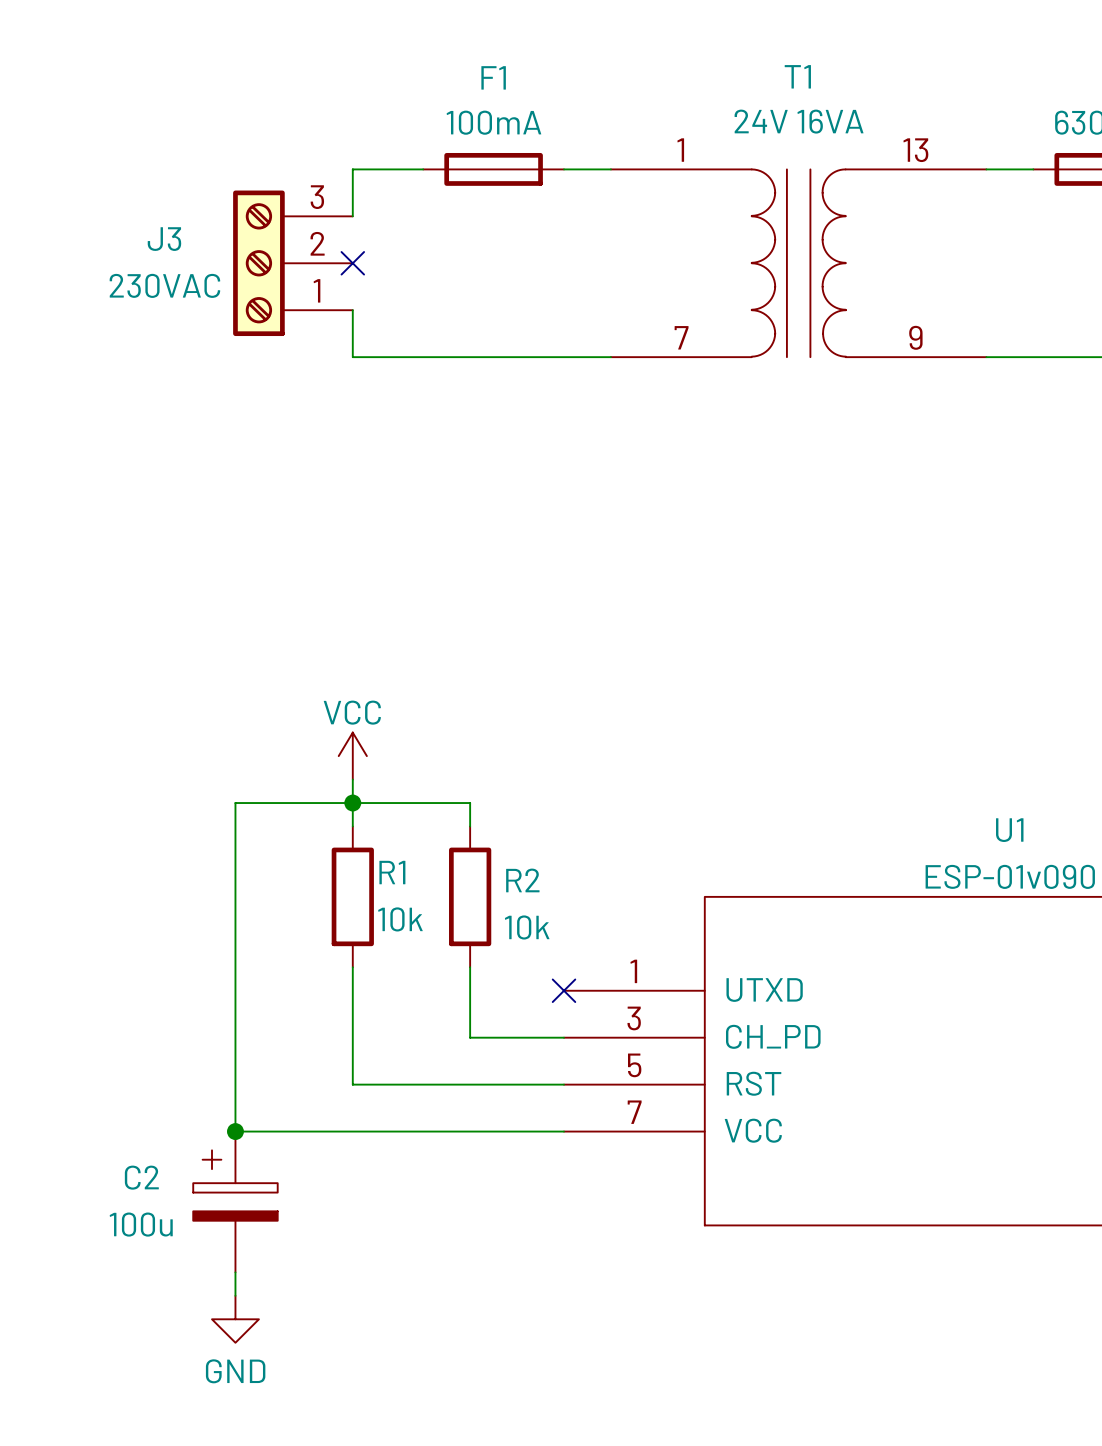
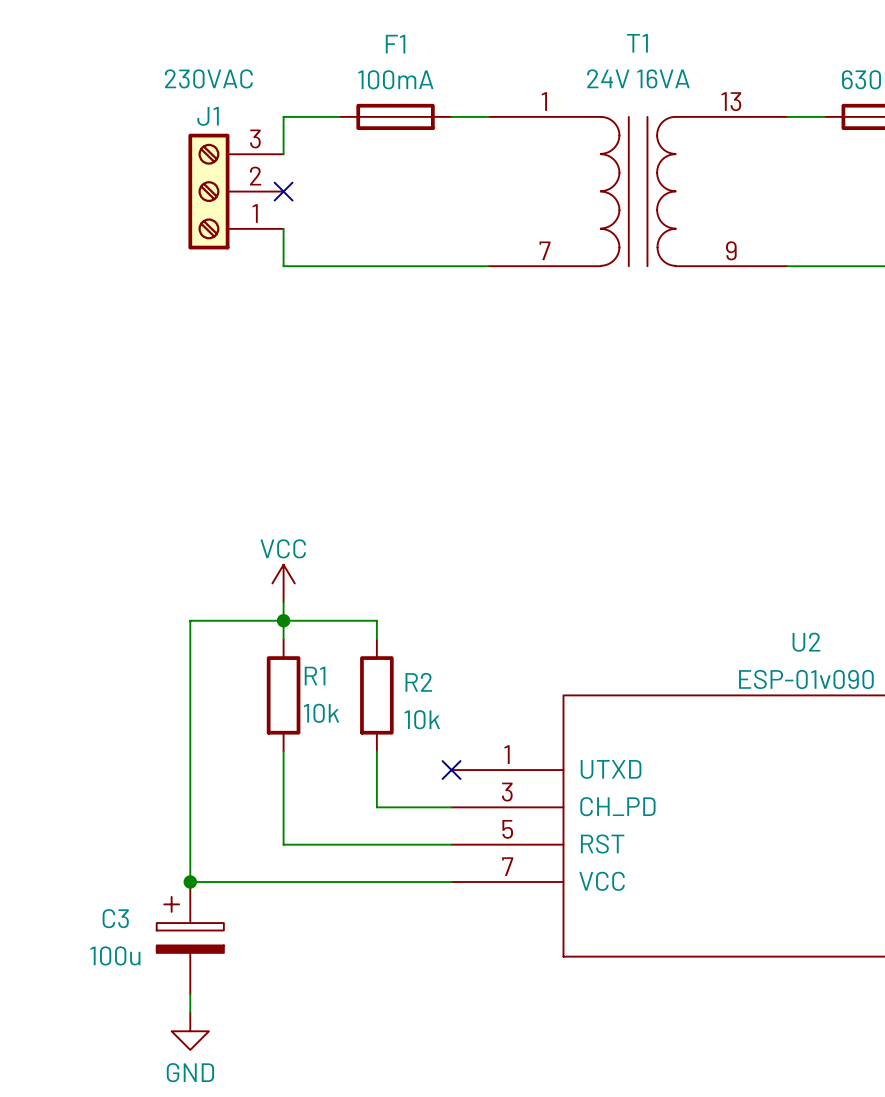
J3 name: J3 (164, 239) -> J1 (208, 116)
J3 value position: 230VAC (164, 285) -> 230VAC (208, 78)
U1 name: U1 (1009, 830) -> U2 (806, 642)
C2 name: C2 (141, 1177) -> C3 (115, 918)

